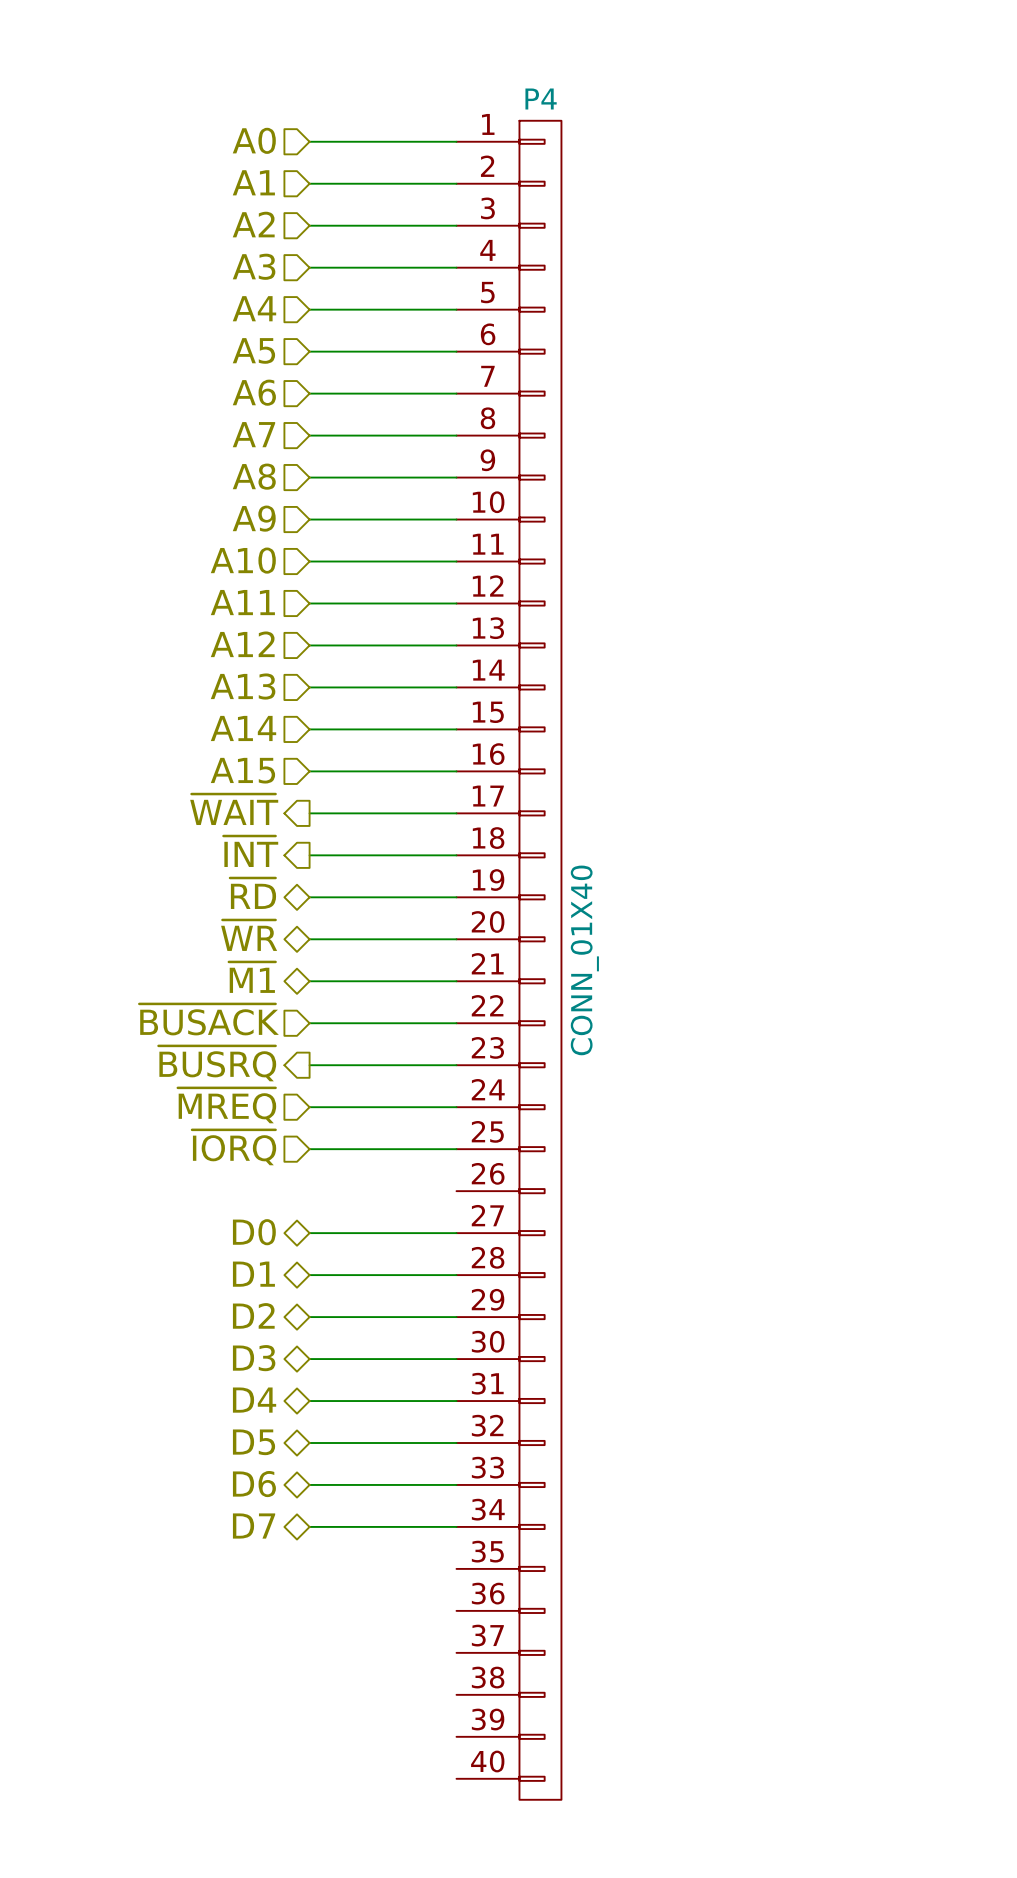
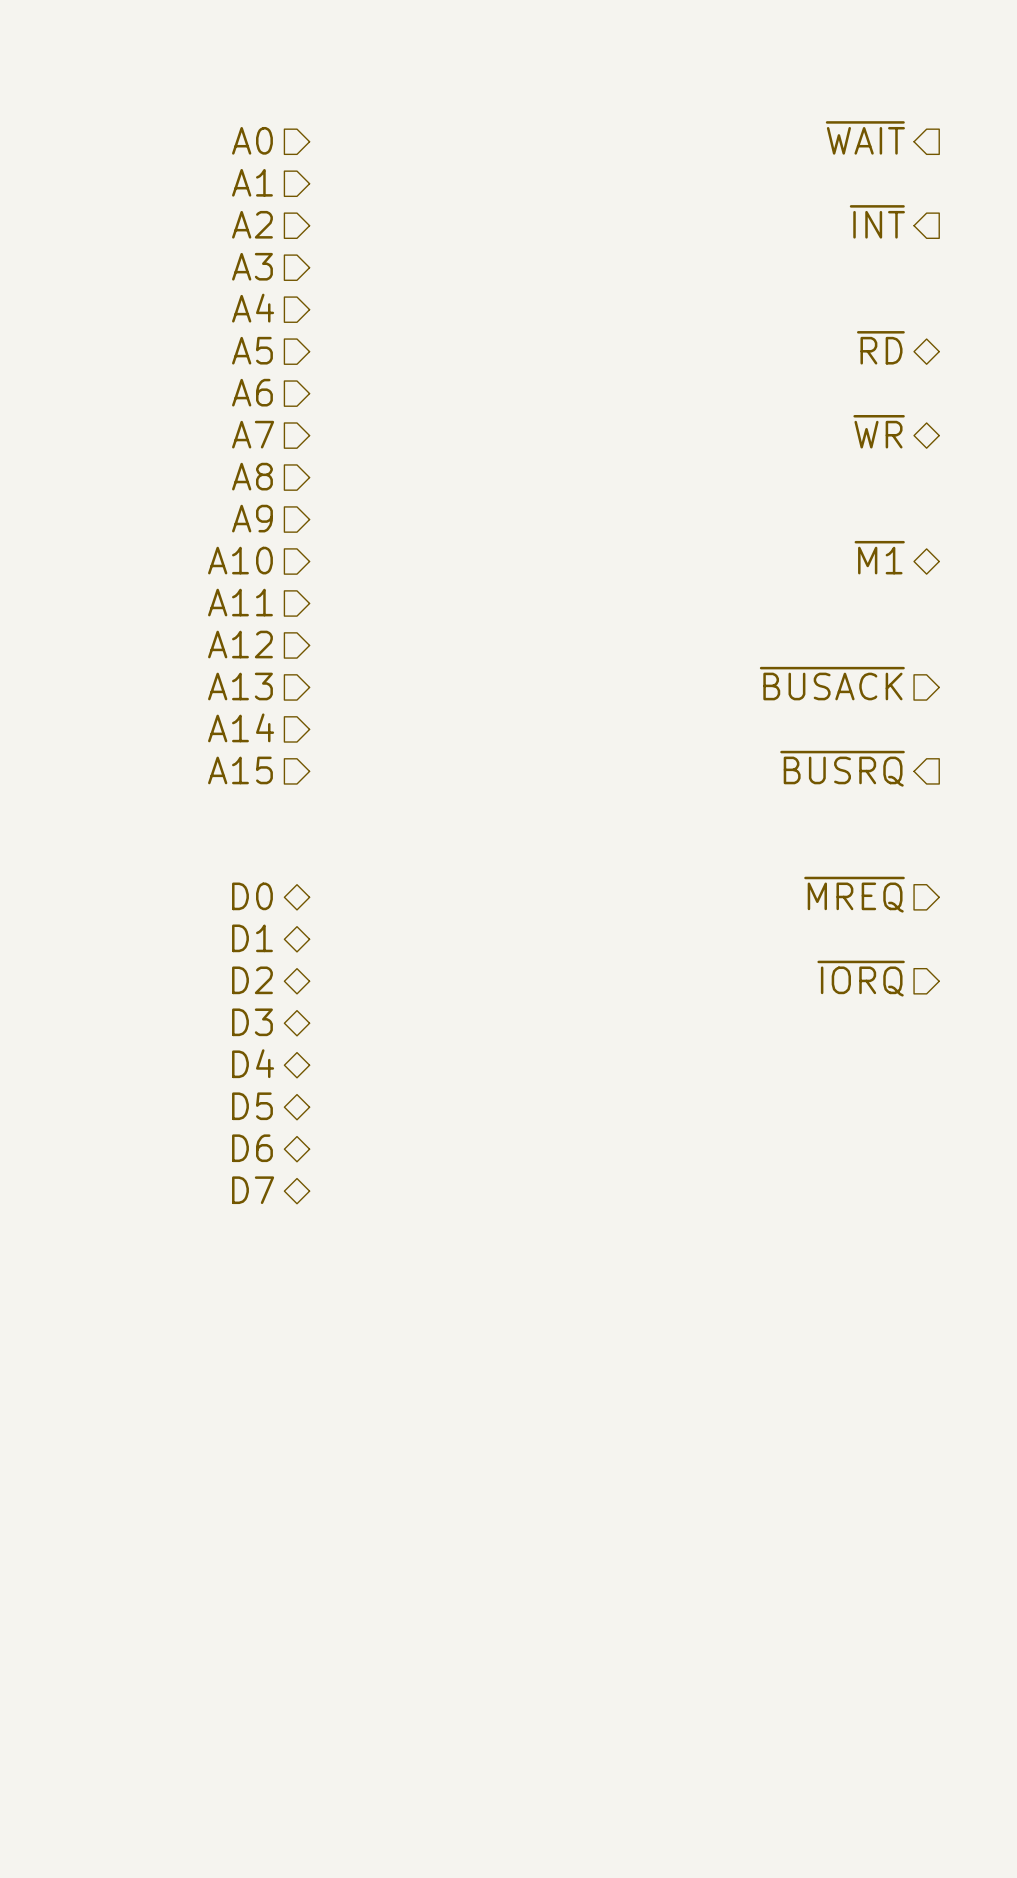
hierarchical label: none -> ~{WAIT} (865, 137)
wire: (309, 141) (456, 141) -> none
wire: (309, 183) (456, 183) -> none
hierarchical label: none -> ~{INT} (877, 221)
wire: (309, 225) (456, 225) -> none
wire: (309, 267) (456, 267) -> none
wire: (309, 309) (456, 309) -> none
hierarchical label: none -> ~{RD} (880, 347)
wire: (309, 351) (456, 351) -> none
wire: (309, 393) (456, 393) -> none
hierarchical label: none -> ~{WR} (879, 431)
wire: (309, 435) (456, 435) -> none
wire: (309, 477) (456, 477) -> none
wire: (309, 519) (456, 519) -> none
hierarchical label: none -> ~{M1} (879, 557)
wire: (309, 561) (456, 561) -> none
wire: (309, 603) (456, 603) -> none
wire: (309, 645) (456, 645) -> none
hierarchical label: none -> ~{BUSACK} (832, 683)
wire: (309, 687) (456, 687) -> none
wire: (309, 729) (456, 729) -> none
hierarchical label: none -> ~{BUSRQ} (842, 768)
wire: (309, 771) (456, 771) -> none
hierarchical label: ~{WAIT} (234, 809) -> none
wire: (309, 813) (456, 813) -> none
hierarchical label: ~{INT} (250, 851) -> none
wire: (309, 855) (456, 855) -> none
hierarchical label: ~{RD} (253, 893) -> D0 (252, 896)
hierarchical label: none -> ~{MREQ} (854, 894)
wire: (309, 897) (456, 897) -> none
hierarchical label: ~{WR} (249, 935) -> D1 (252, 938)
wire: (309, 939) (456, 939) -> none
P4: CONN_01X40 (508, 960) -> none
hierarchical label: ~{M1} (252, 977) -> D2 (252, 980)
hierarchical label: none -> ~{IORQ} (861, 978)
wire: (309, 981) (456, 981) -> none
hierarchical label shape: input (209, 1019) -> bidirectional (252, 1022)
hierarchical label: ~{BUSACK} (209, 1019) -> D3 (252, 1022)
wire: (309, 1023) (456, 1023) -> none
hierarchical label shape: output (217, 1063) -> bidirectional (253, 1063)
hierarchical label: ~{BUSRQ} (217, 1063) -> D4 (253, 1063)
wire: (309, 1065) (456, 1065) -> none
hierarchical label shape: input (226, 1105) -> bidirectional (252, 1106)
hierarchical label: ~{MREQ} (226, 1105) -> D5 (252, 1106)
wire: (309, 1107) (456, 1107) -> none
hierarchical label shape: input (234, 1147) -> bidirectional (252, 1148)
hierarchical label: ~{IORQ} (234, 1147) -> D6 (252, 1148)
wire: (309, 1149) (456, 1149) -> none
hierarchical label: D0 (254, 1232) -> none
wire: (309, 1233) (456, 1233) -> none
hierarchical label: D1 (253, 1274) -> none
wire: (309, 1275) (456, 1275) -> none
hierarchical label: D2 (253, 1315) -> none
wire: (309, 1317) (456, 1317) -> none
hierarchical label: D3 (254, 1358) -> none
wire: (309, 1359) (456, 1359) -> none
hierarchical label: D4 (254, 1400) -> none
wire: (309, 1401) (456, 1401) -> none
hierarchical label: D5 (254, 1442) -> none
wire: (309, 1443) (456, 1443) -> none
hierarchical label: D6 (254, 1484) -> none
wire: (309, 1484) (456, 1484) -> none
hierarchical label position: D7 (254, 1526) -> D7 (253, 1190)
wire: (309, 1526) (456, 1526) -> none

